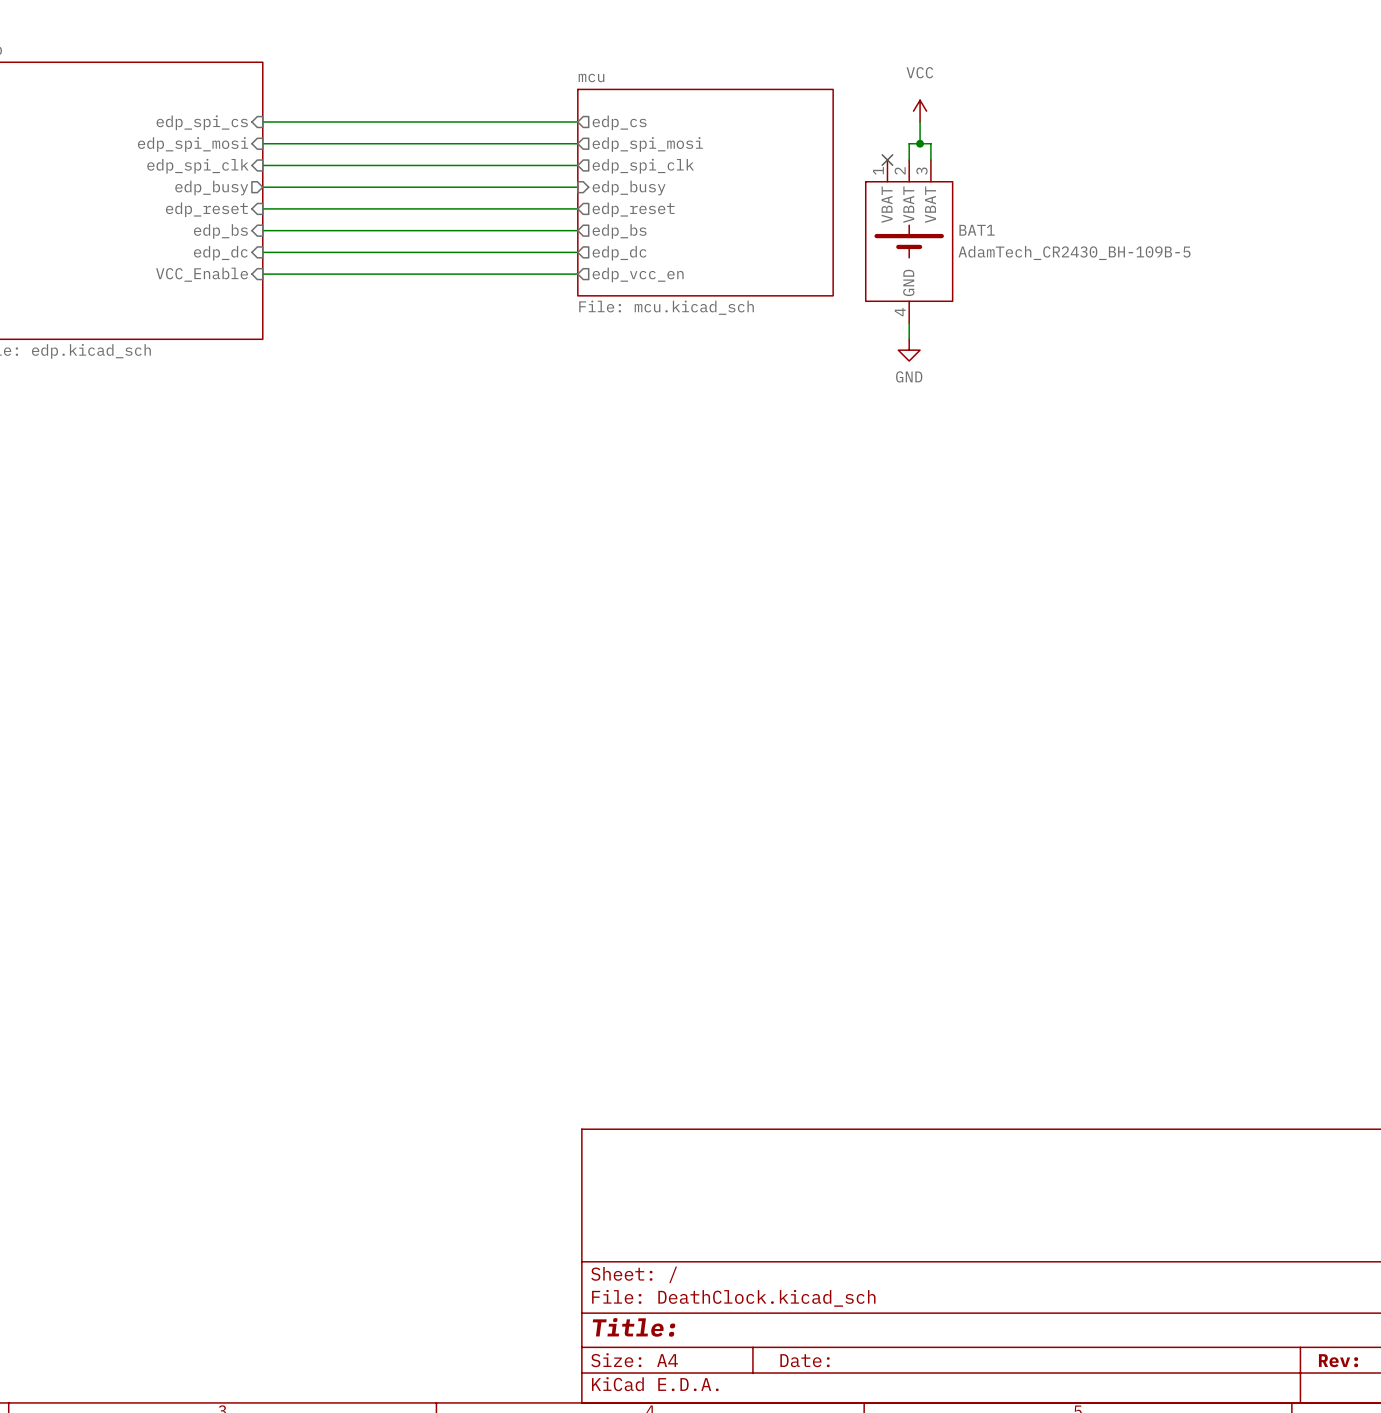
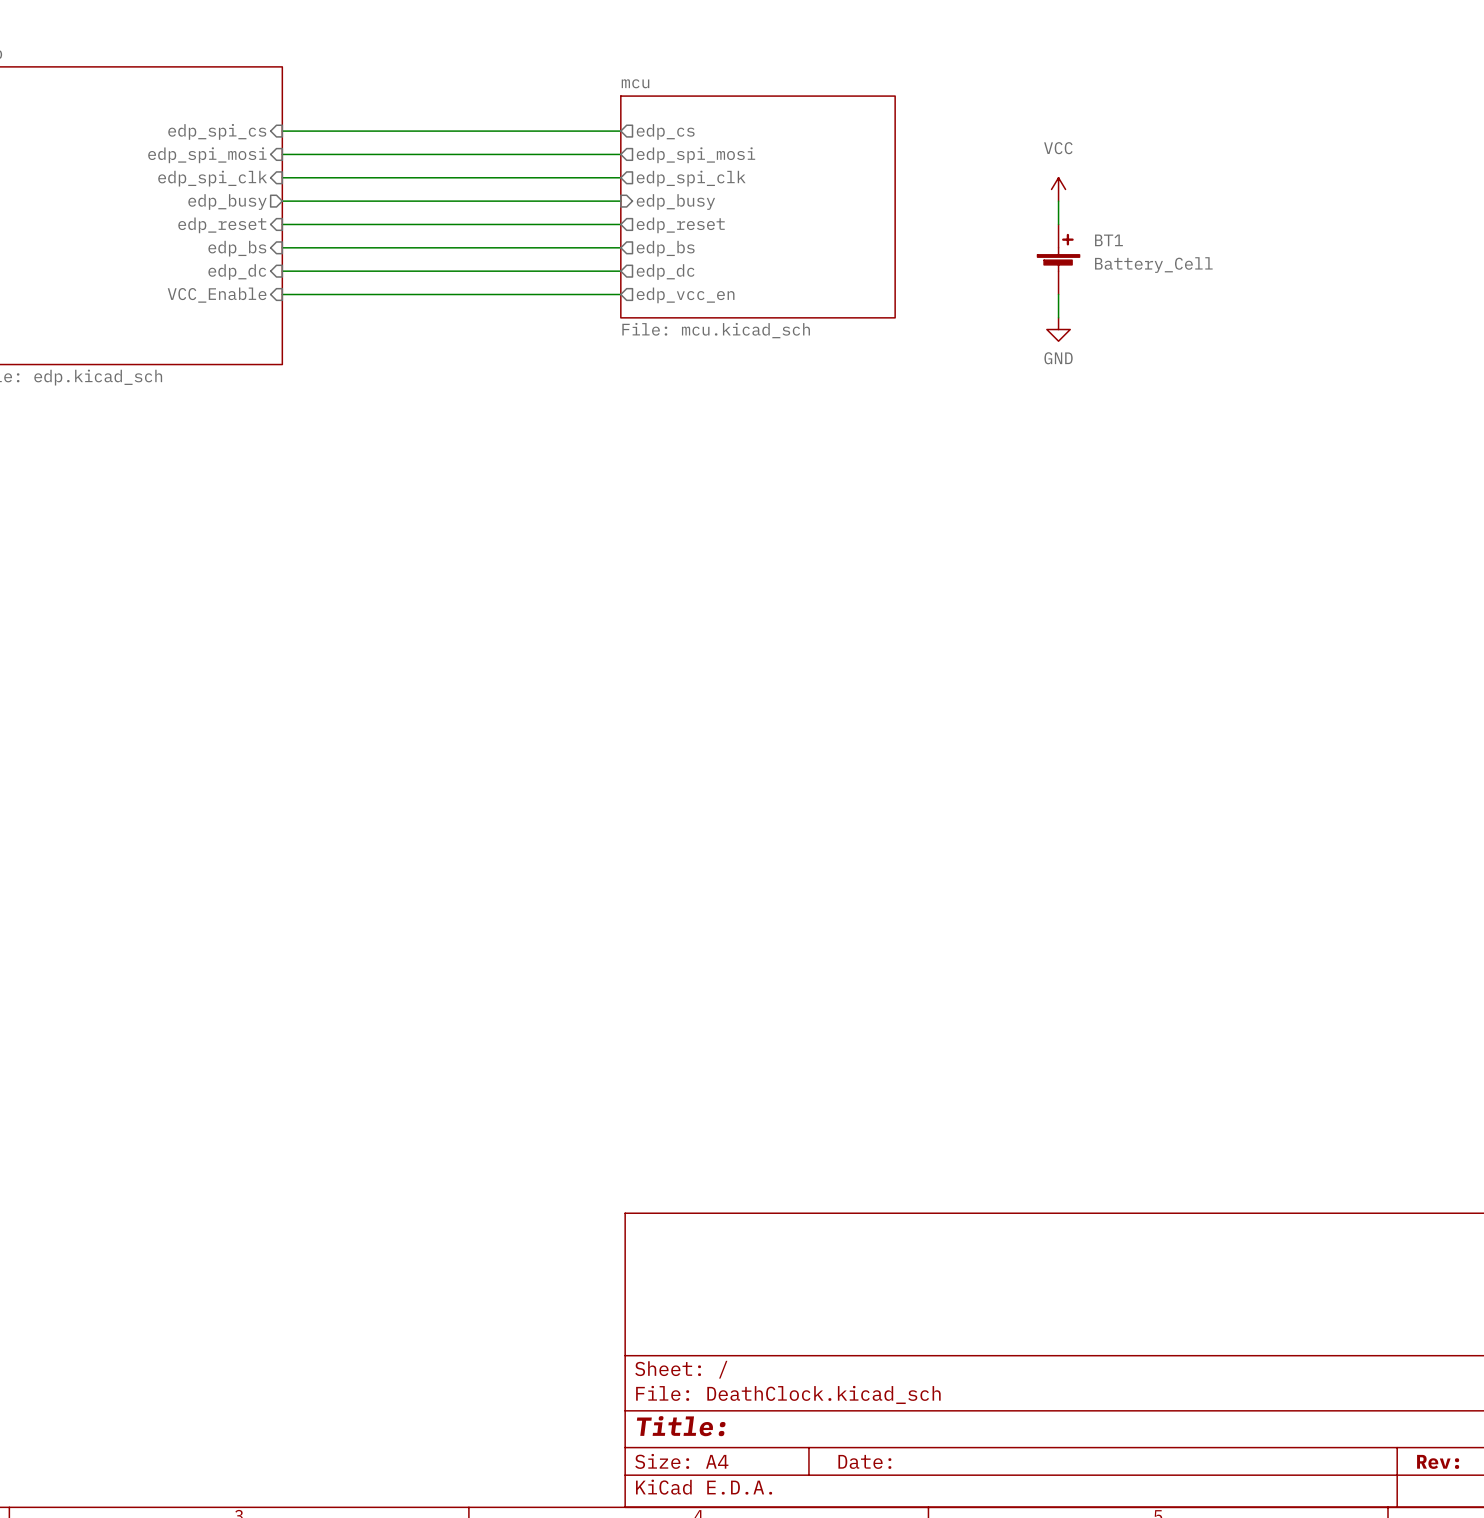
power symbol position: VCC (920, 111) -> VCC (1058, 189)
wire: (920, 122) (920, 143) -> (1058, 201) (1058, 224)
junction: (920, 143) -> none
no-connect mark: (887, 160) -> none
wire: (909, 160) (909, 143) (930, 143) (930, 160) -> none
BAT1: AdamTech_CR2430_BH-109B-5 (909, 241) -> none
BT1: none -> Battery_Cell (1058, 259)
wire: none -> (1058, 294) (1058, 317)
wire: (909, 323) (909, 339) -> none
power symbol position: GND (909, 350) -> GND (1058, 329)

